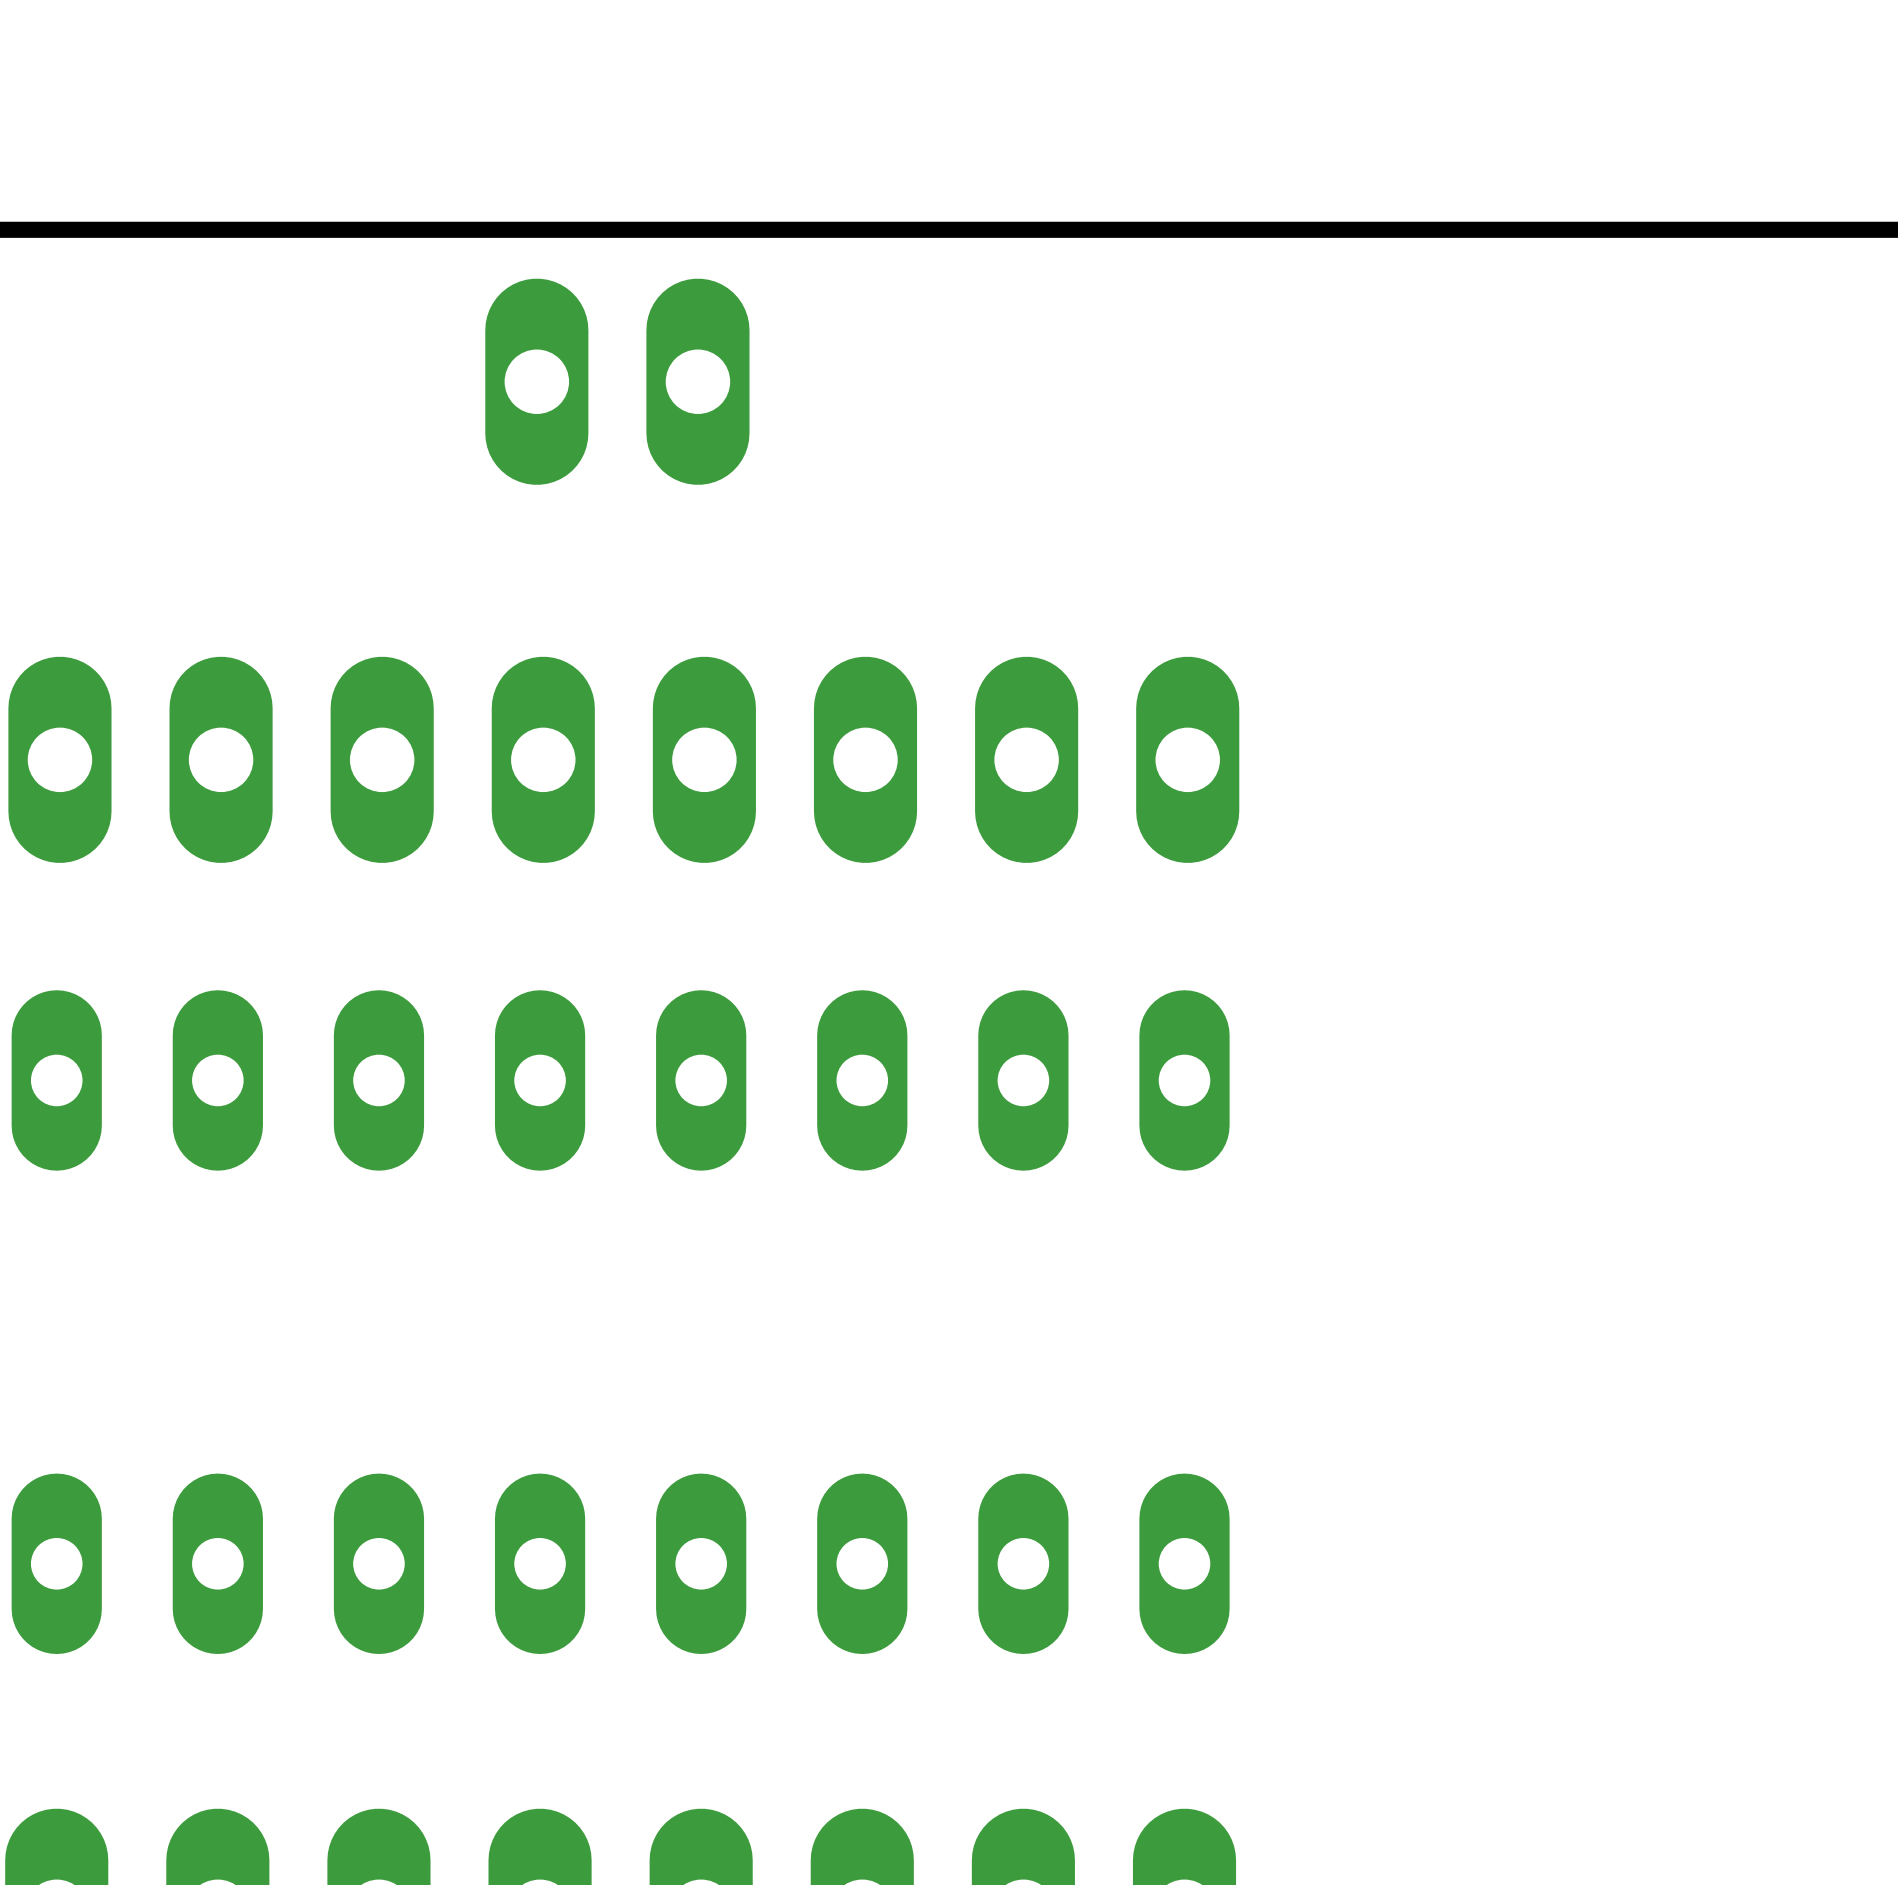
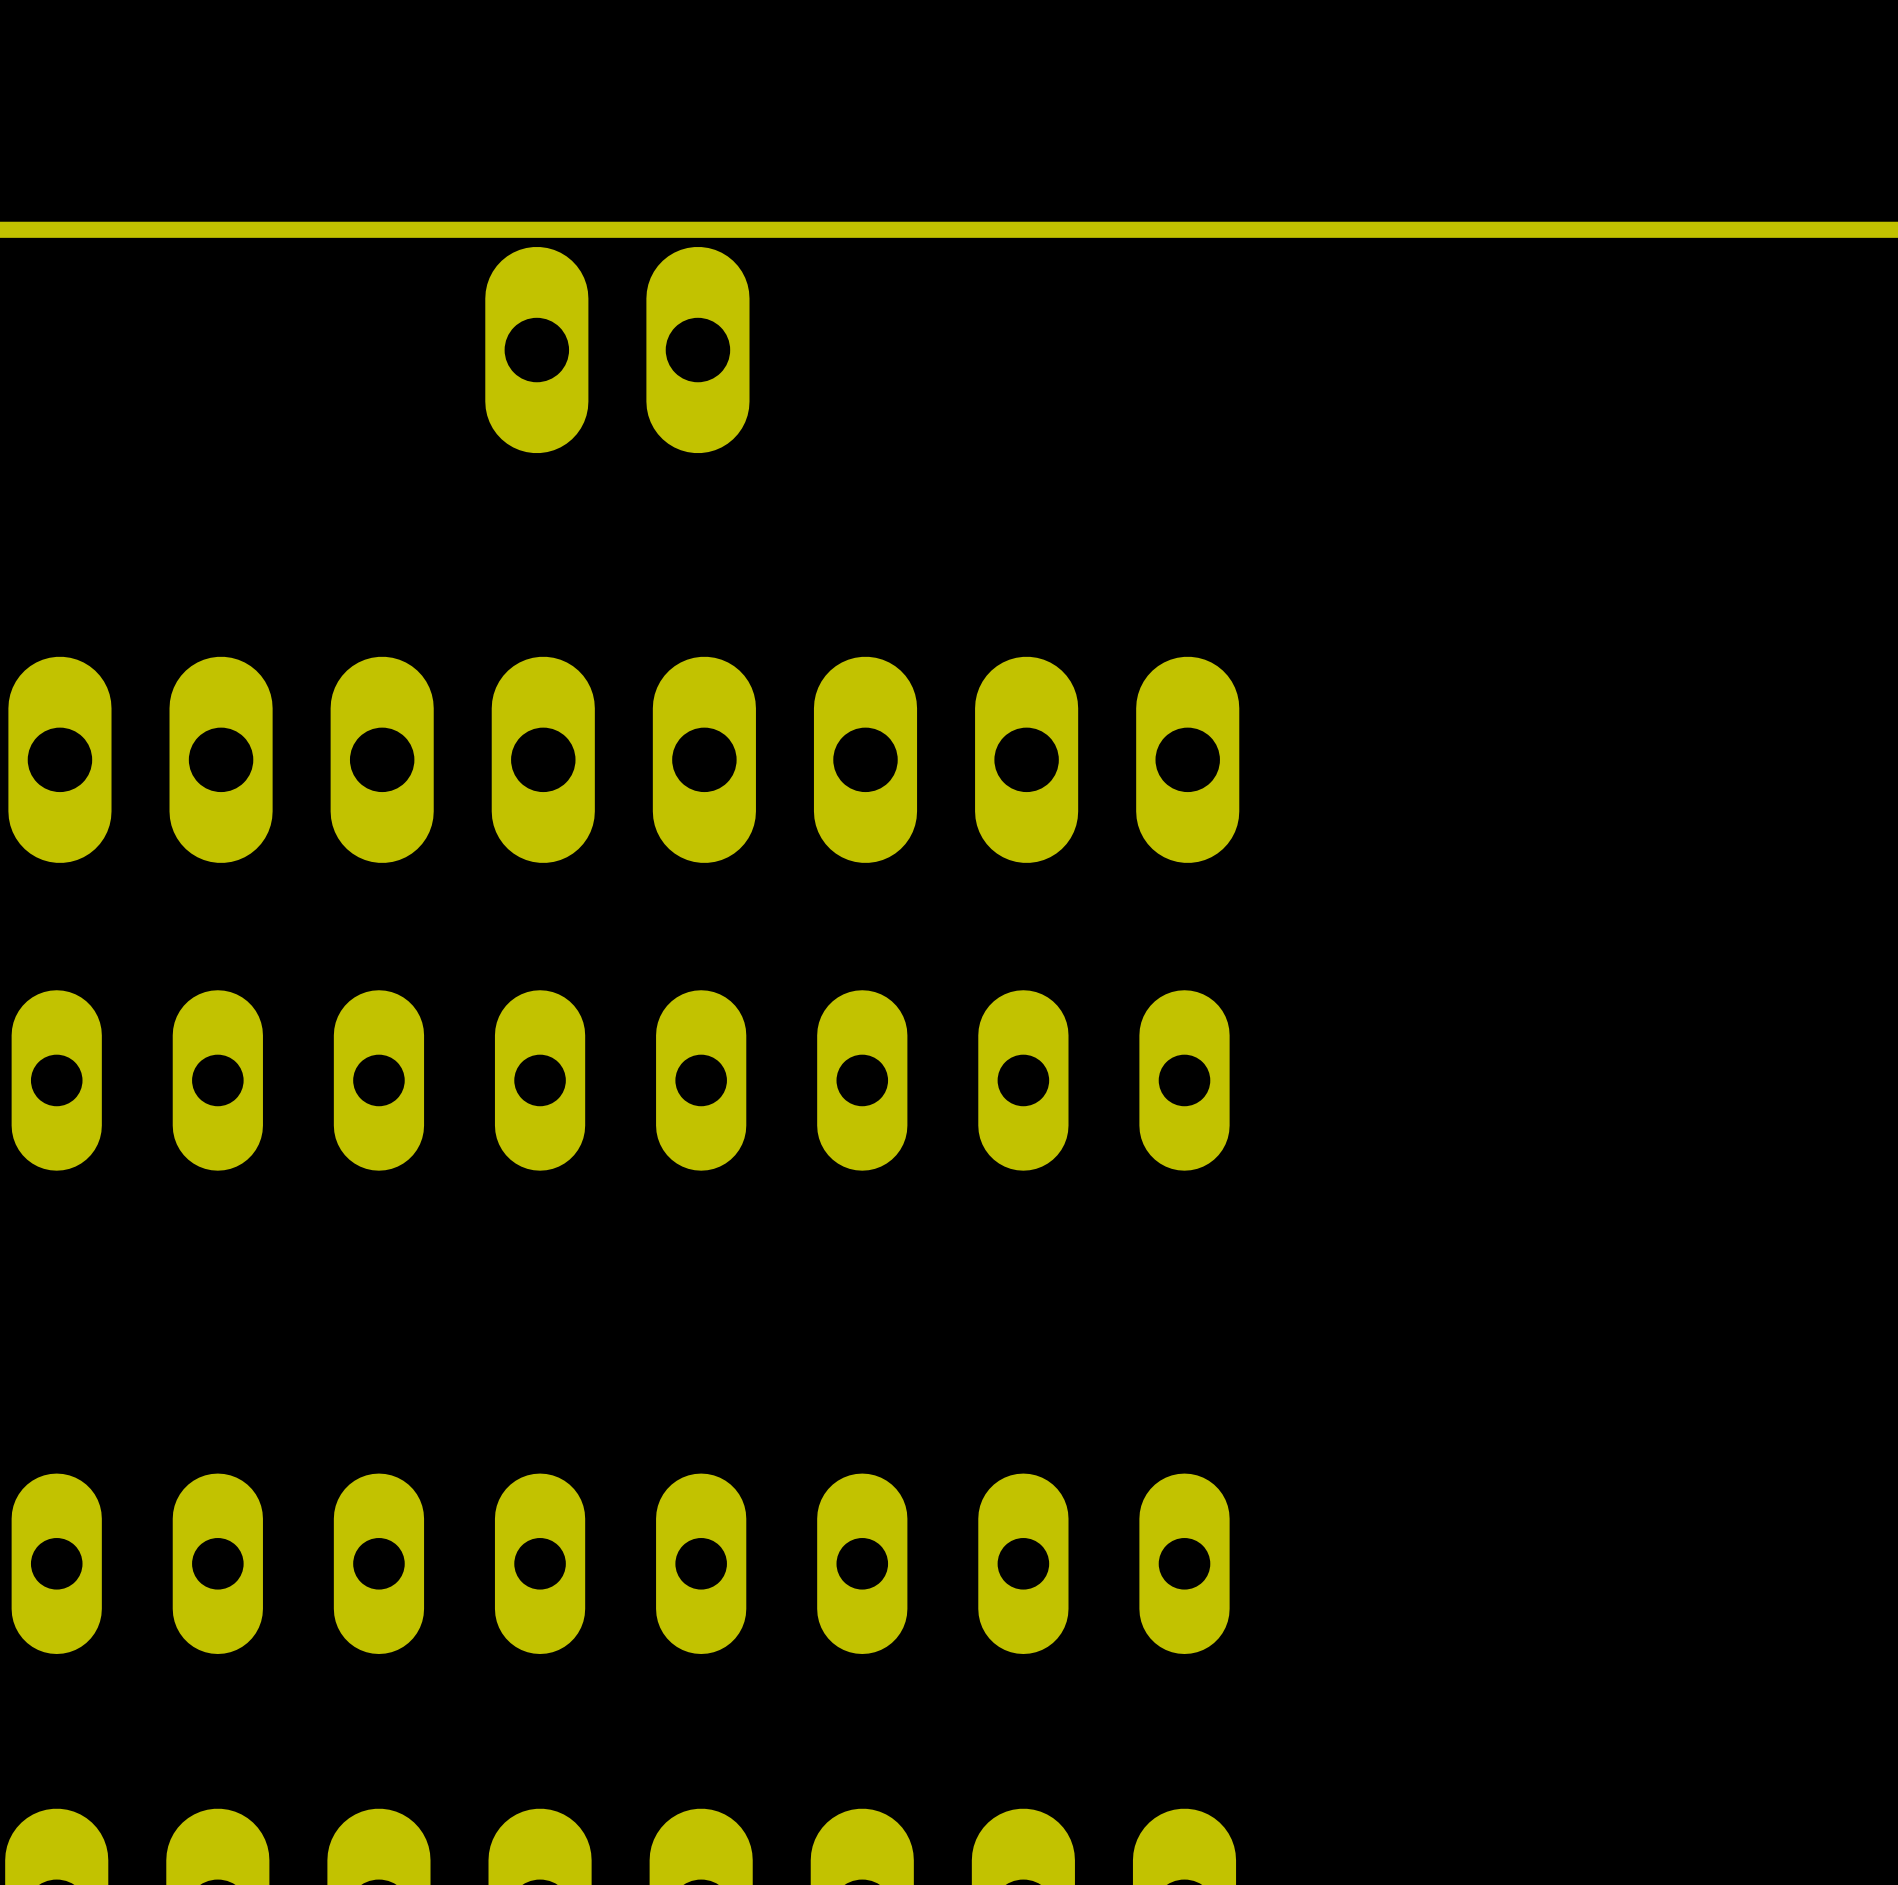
part position: (617, 381) -> (617, 350)

